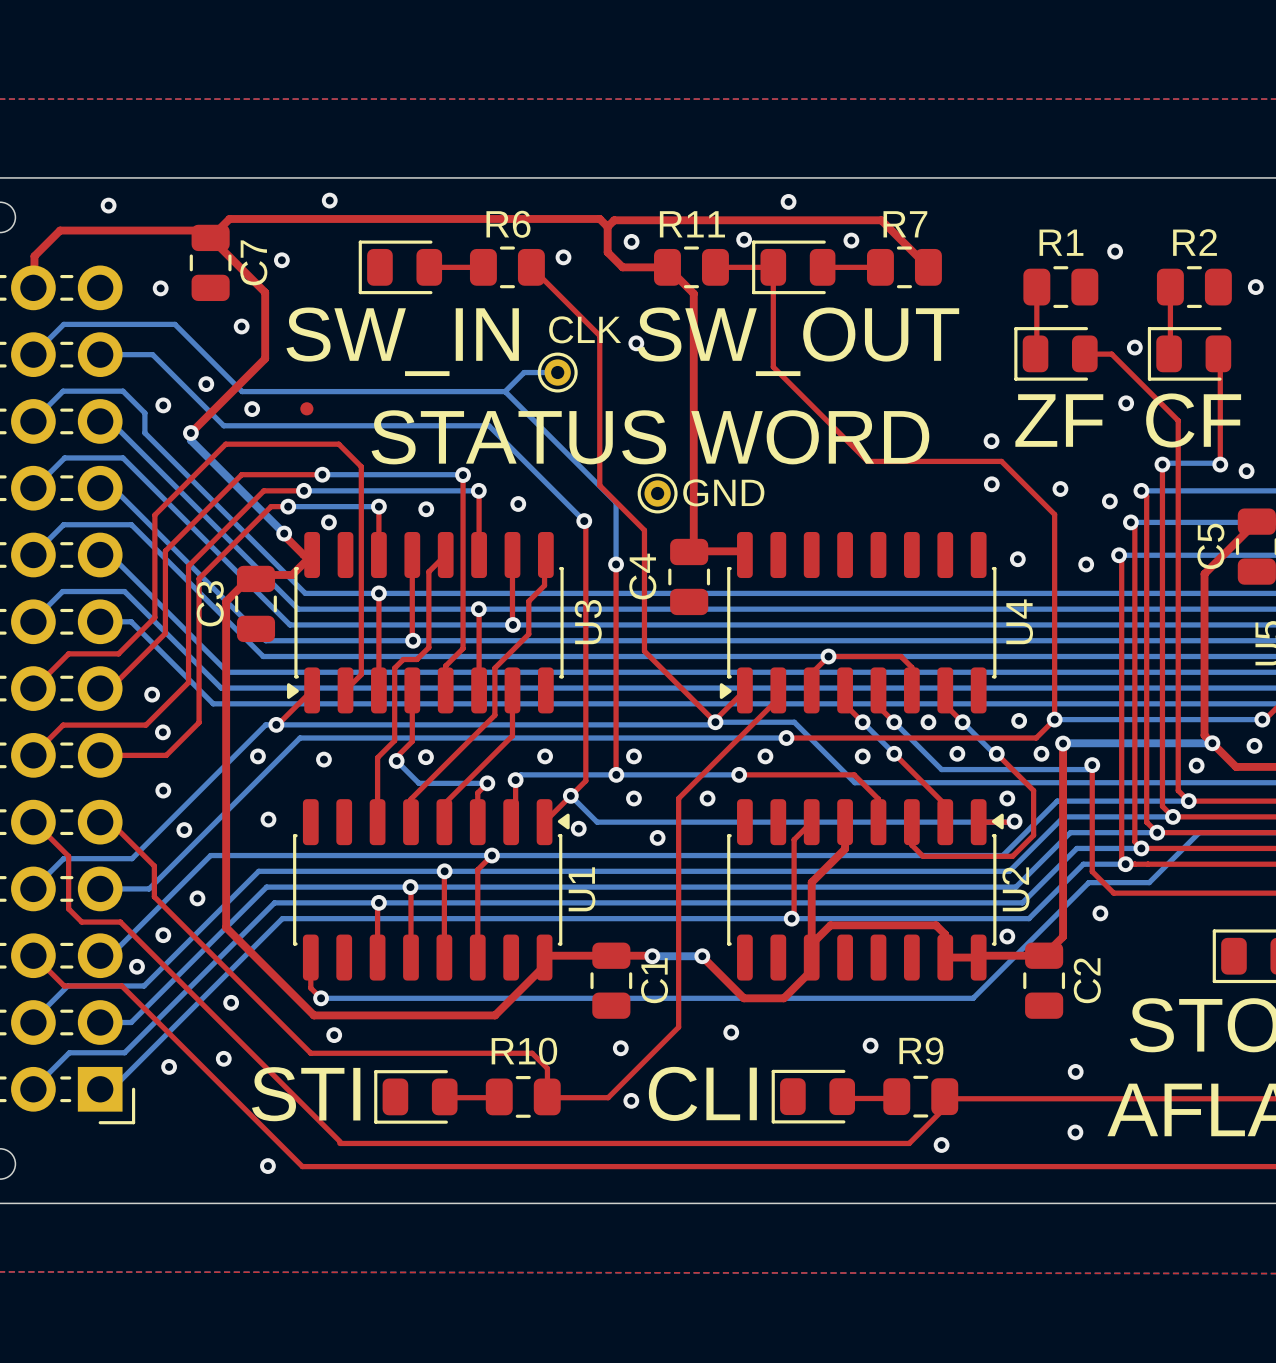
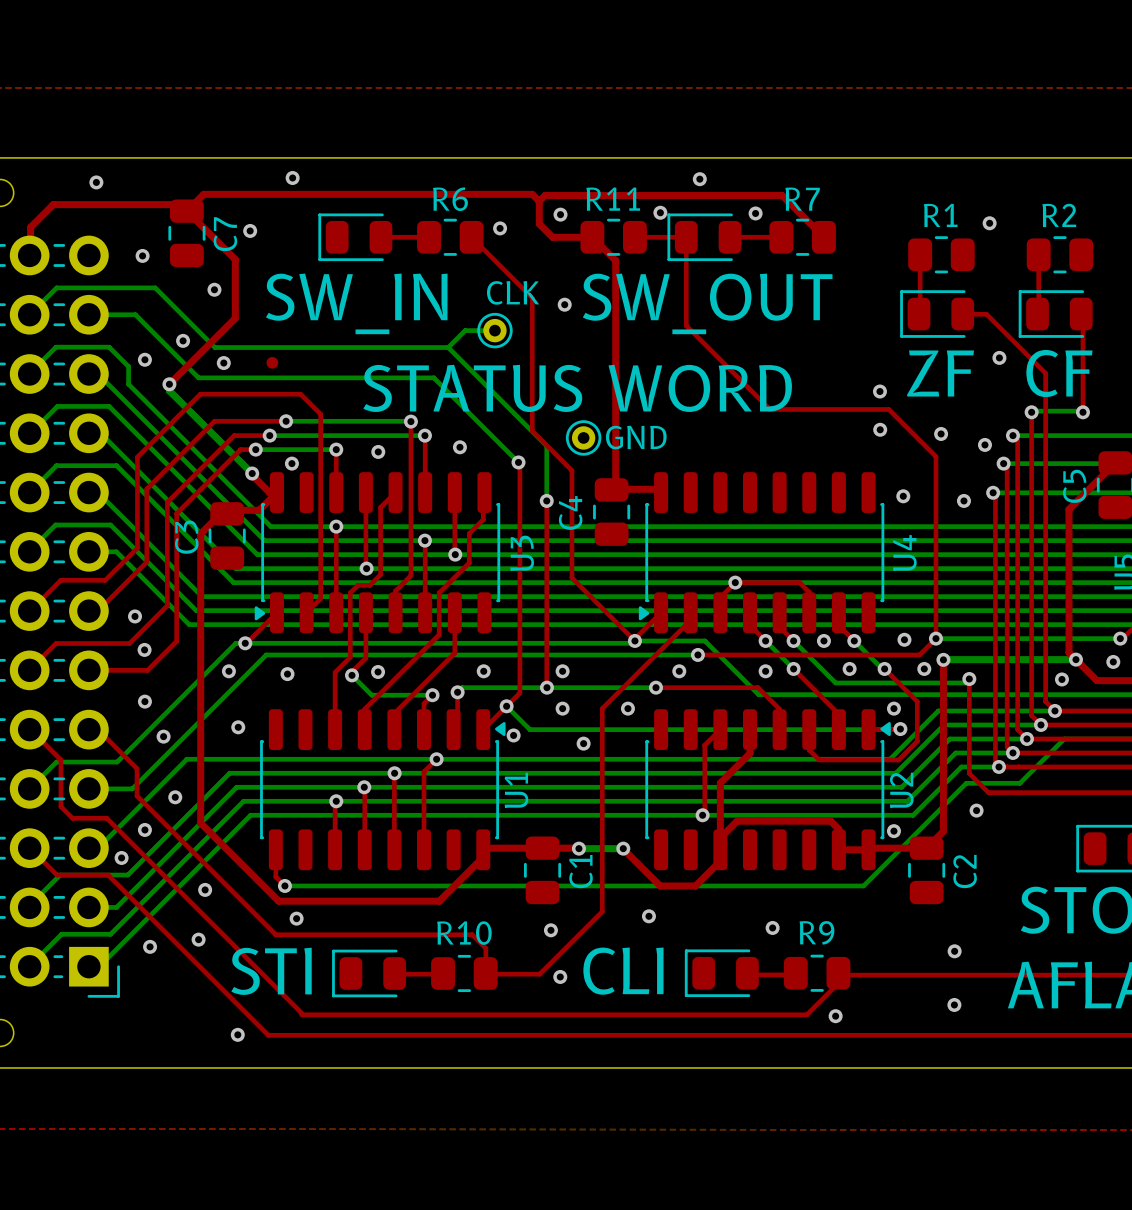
via: (1255, 287) -> none
via: (1134, 347) -> none
via: (1246, 471) -> none

